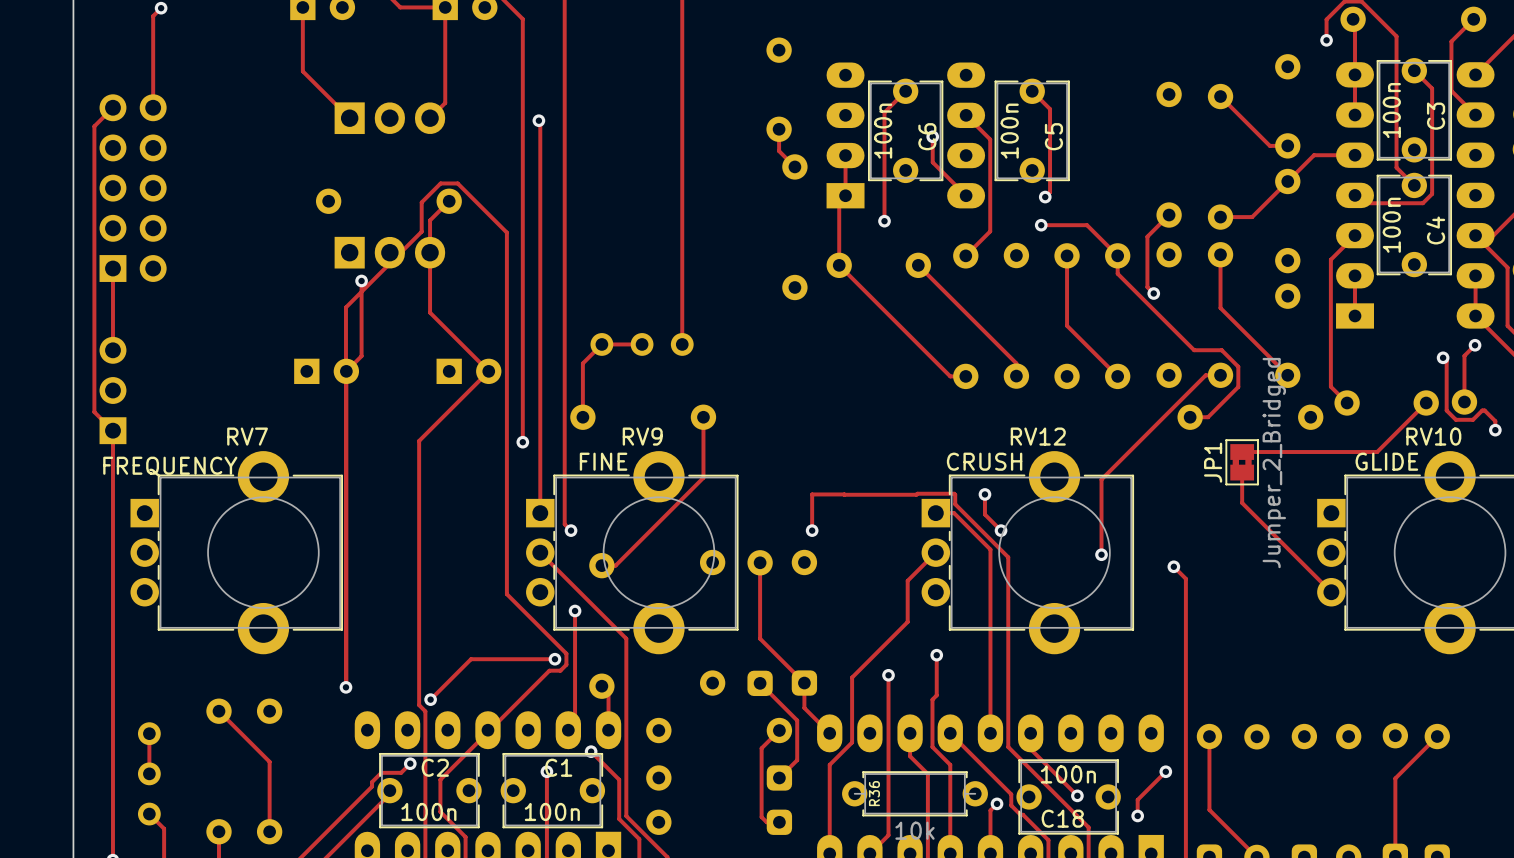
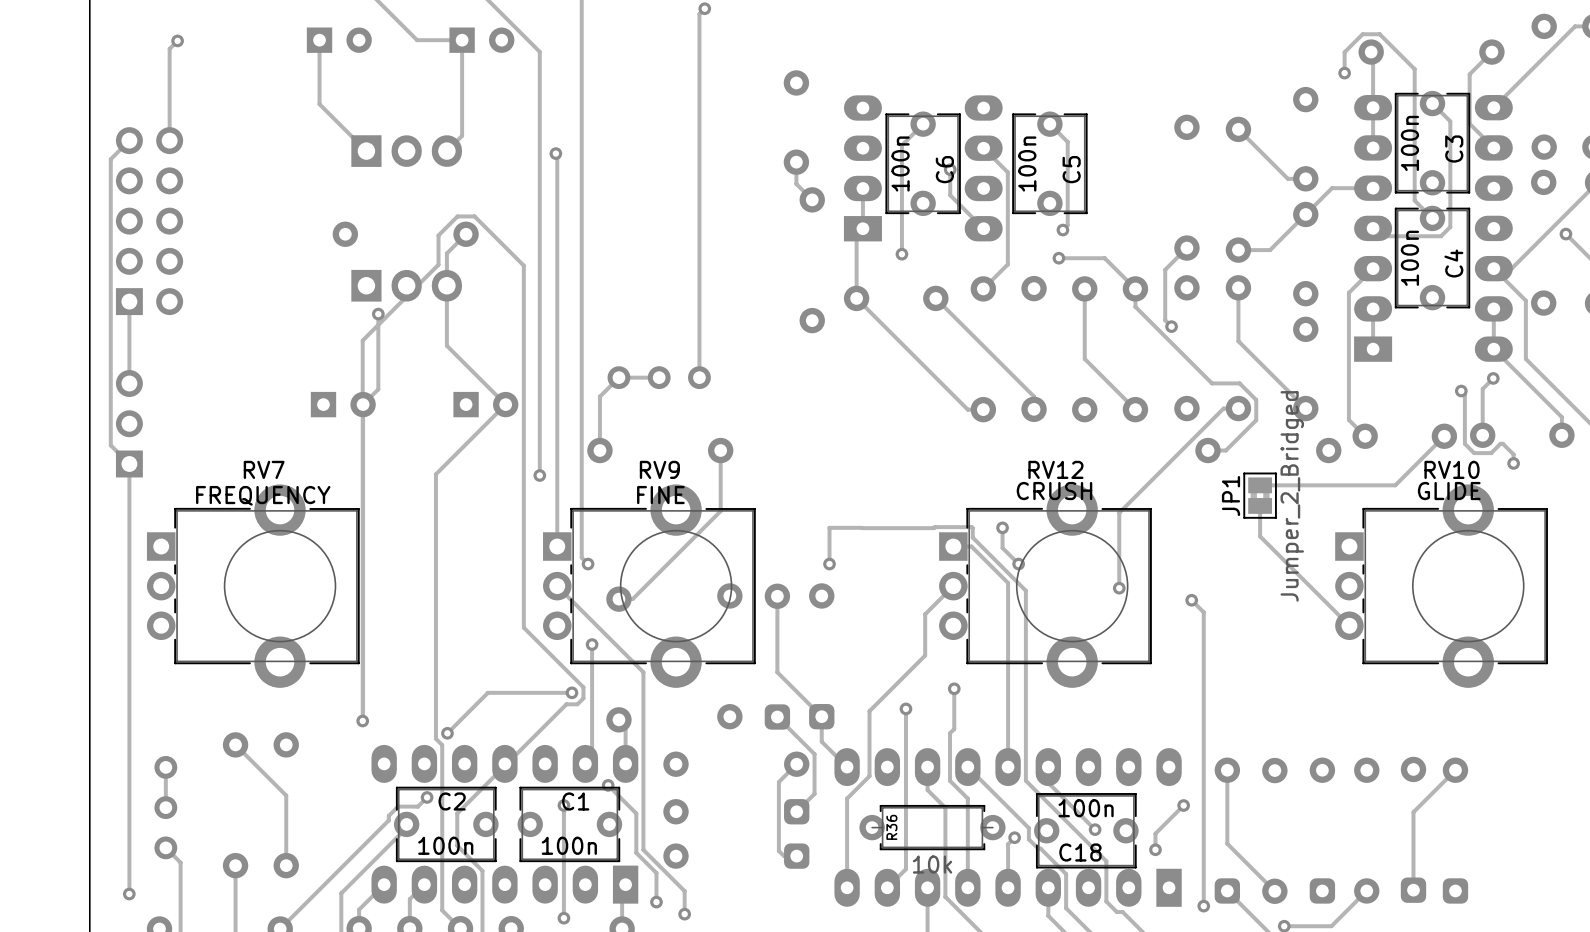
RV9 value position: FINE (603, 461) -> FINE (660, 495)
RV12 value position: CRUSH (984, 461) -> CRUSH (1054, 491)
RV10 value position: GLIDE (1386, 461) -> GLIDE (1449, 491)
RV7 value position: FREQUENCY (170, 466) -> FREQUENCY (263, 495)

